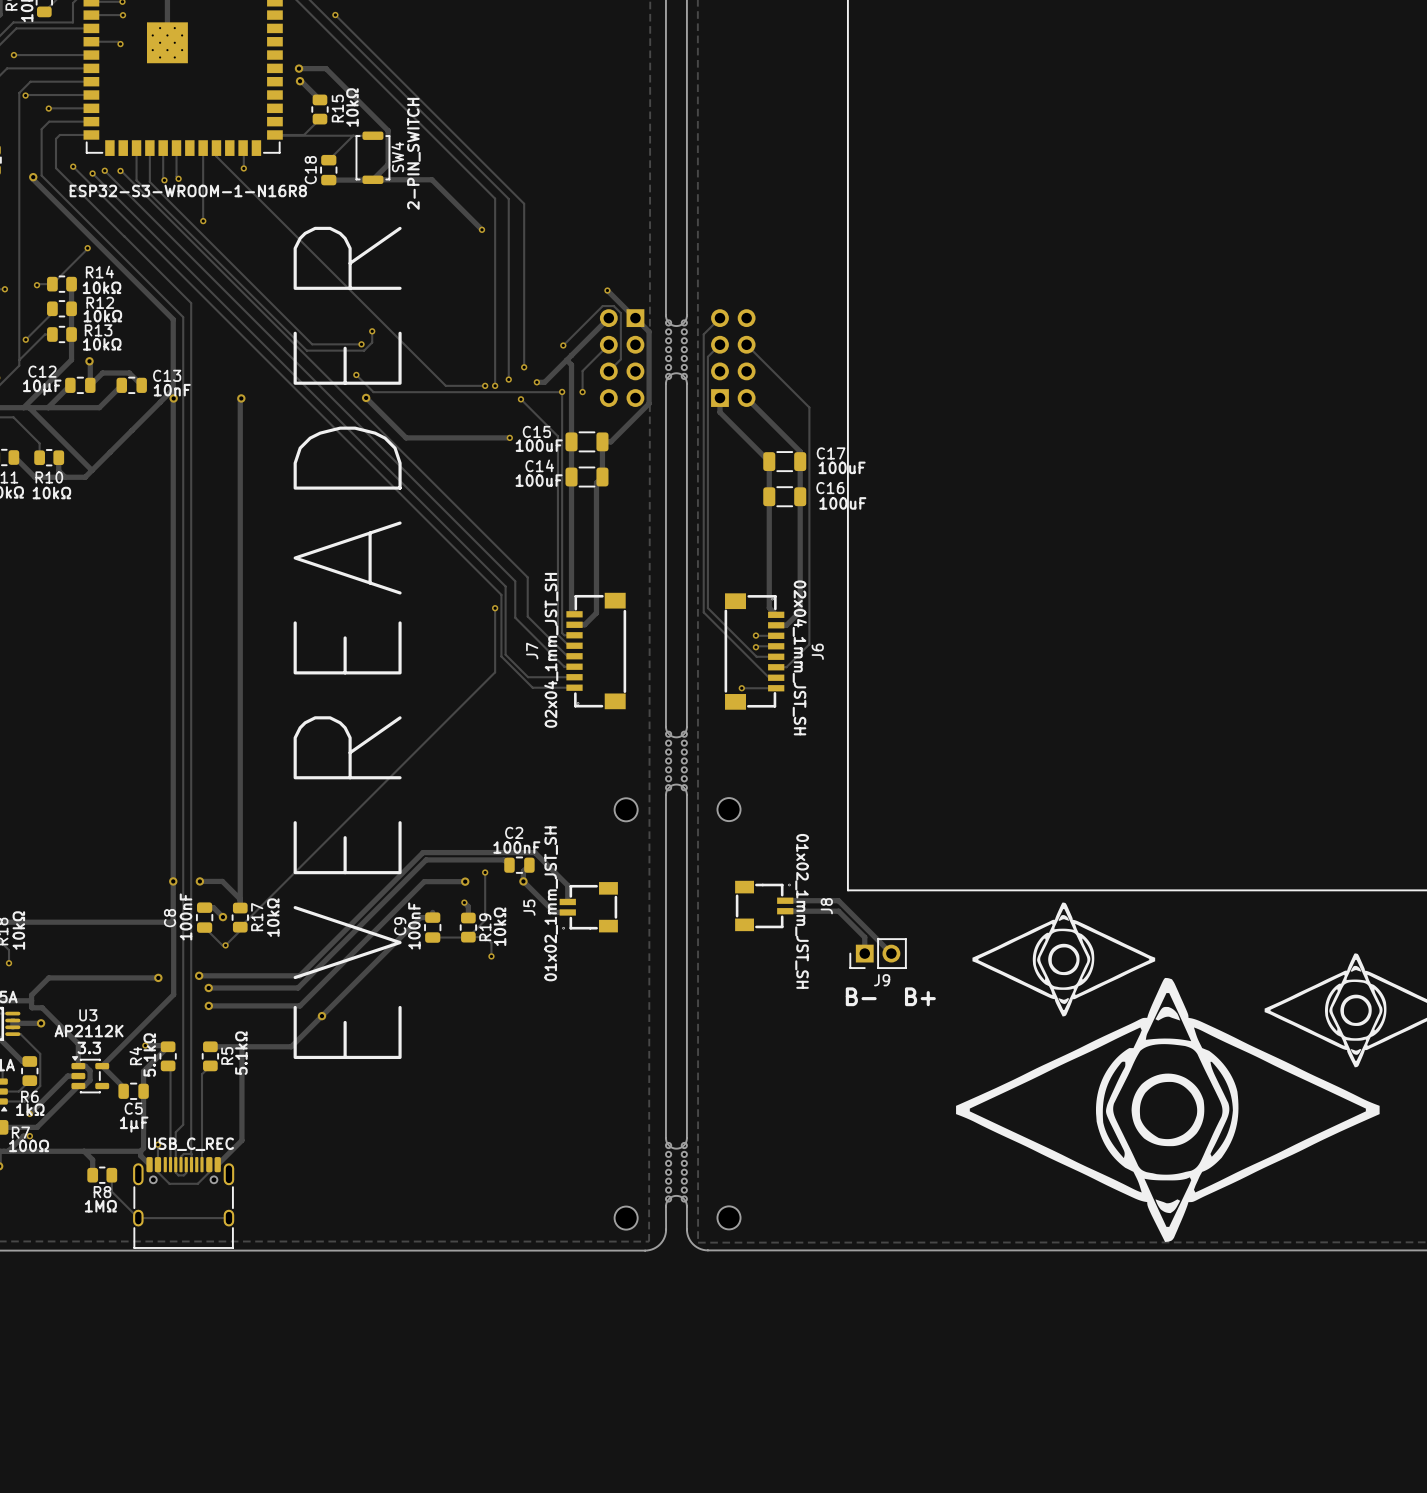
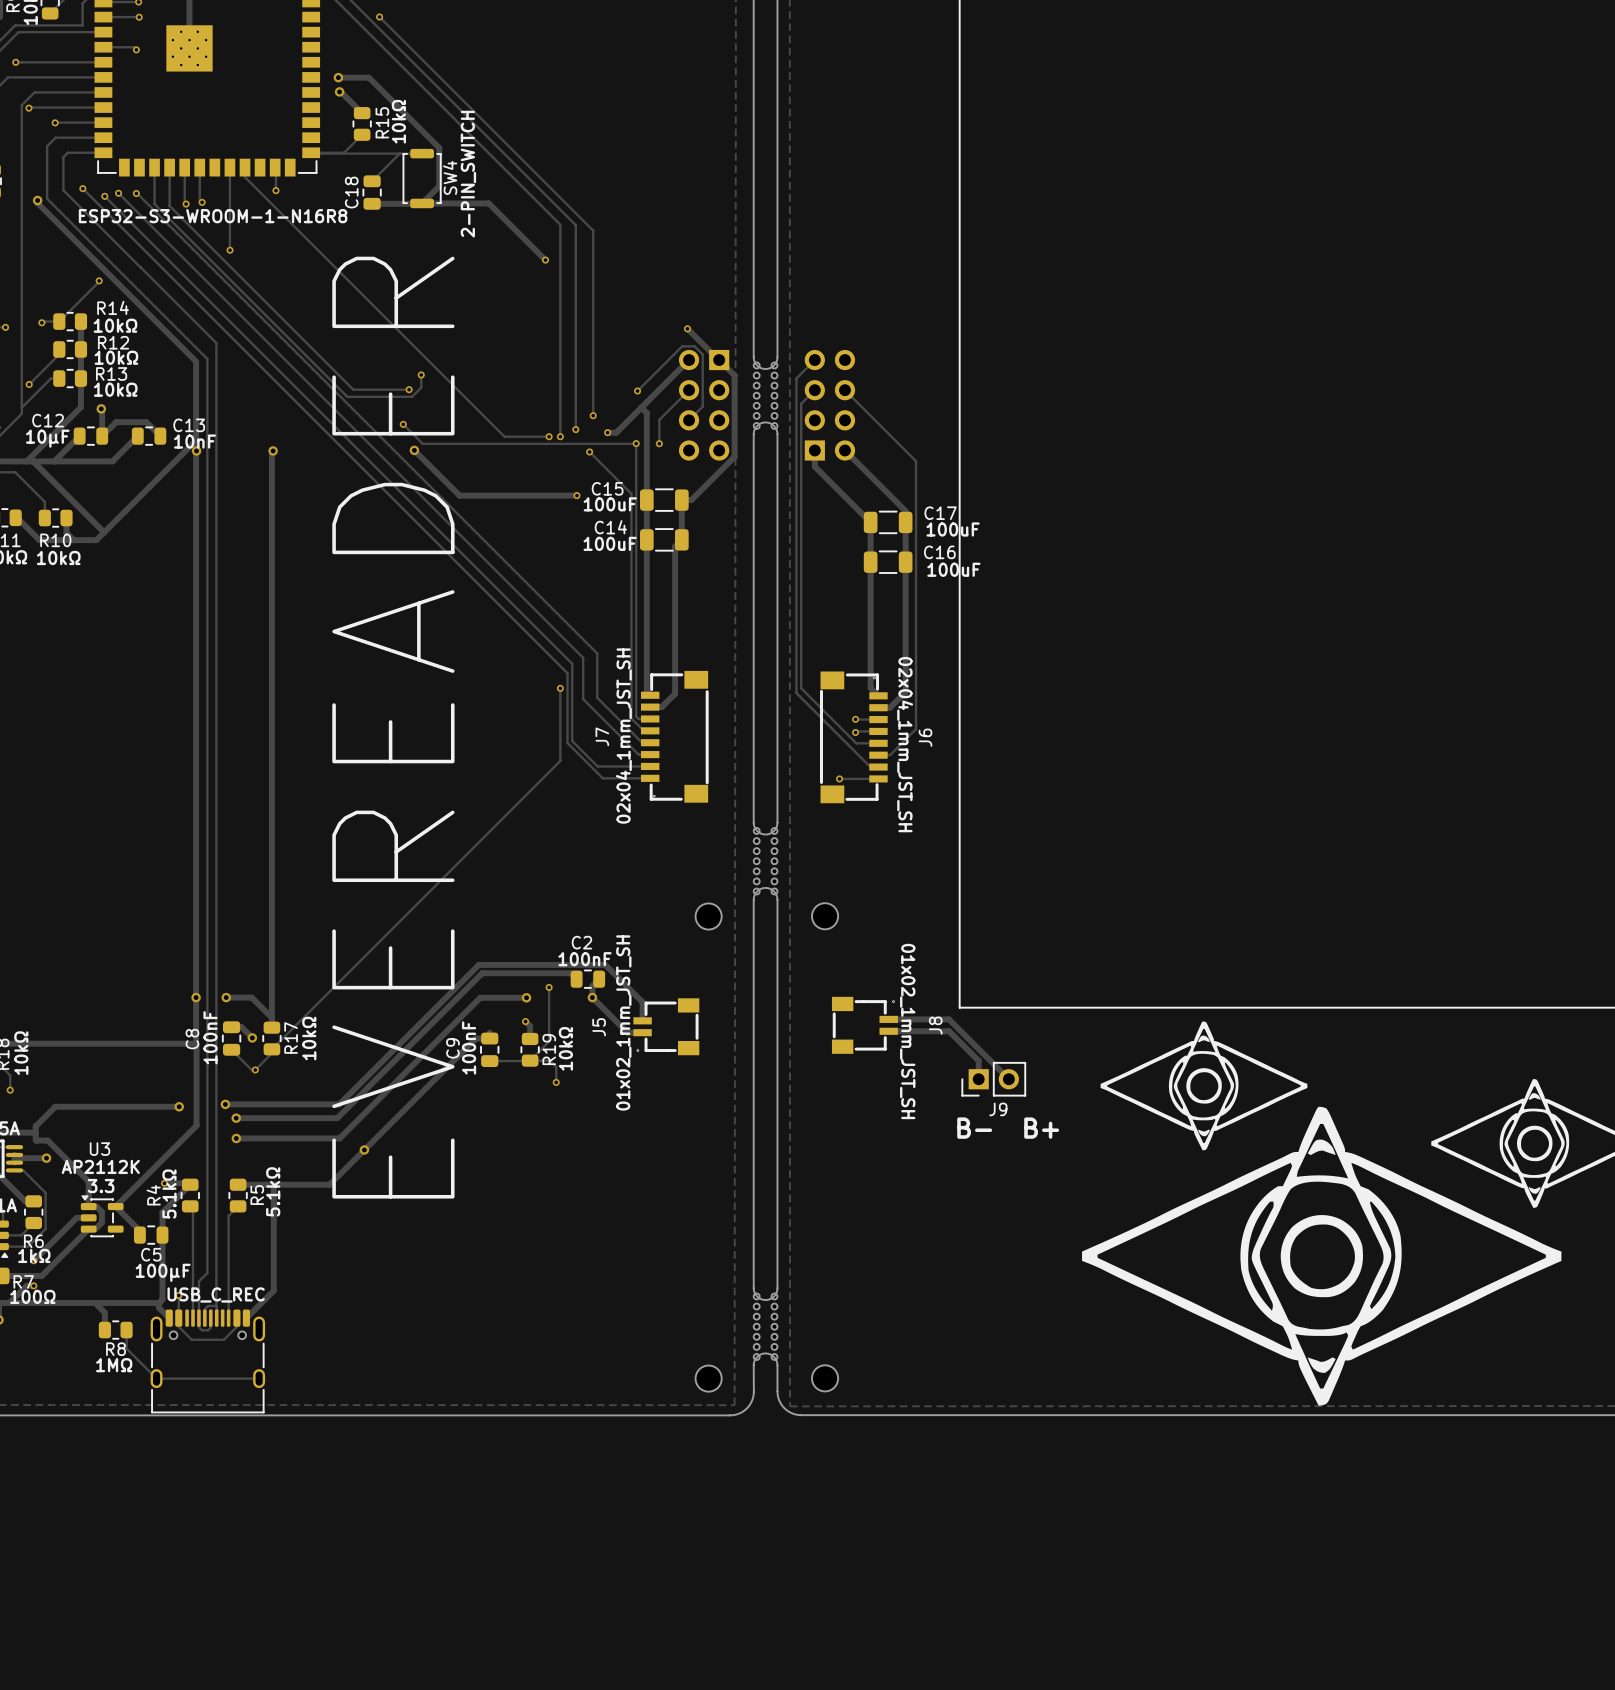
text: 1μF (134, 1124) -> 100μF (163, 1272)

